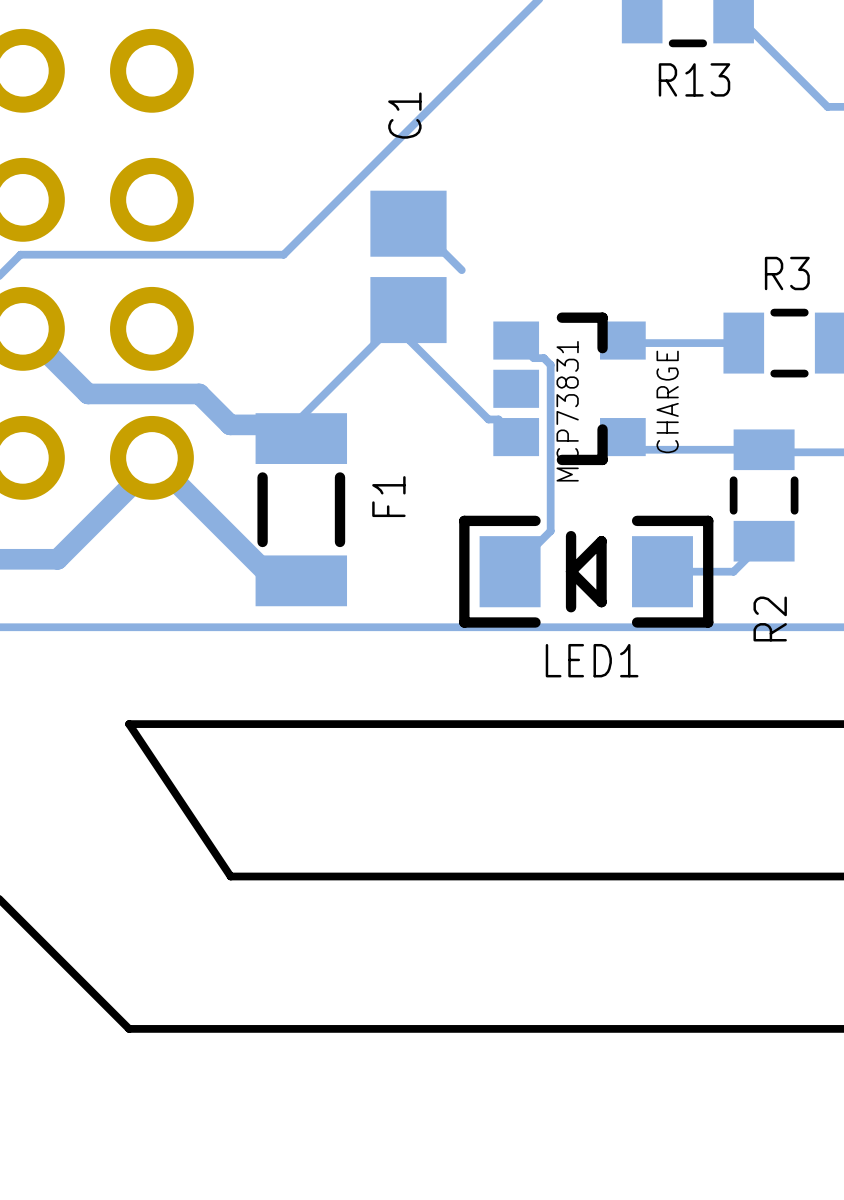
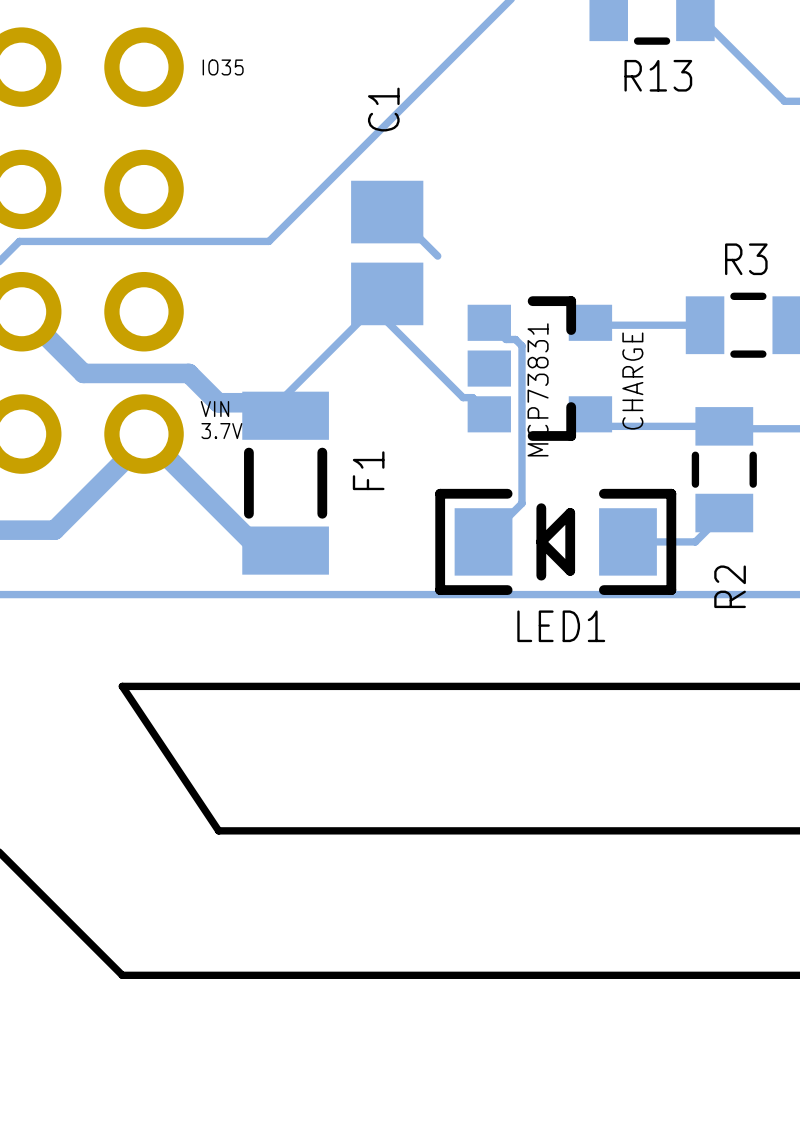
text: none -> IO35 (223, 67)
text: none -> VIN (214, 409)
text: none -> 3.7V (221, 431)

